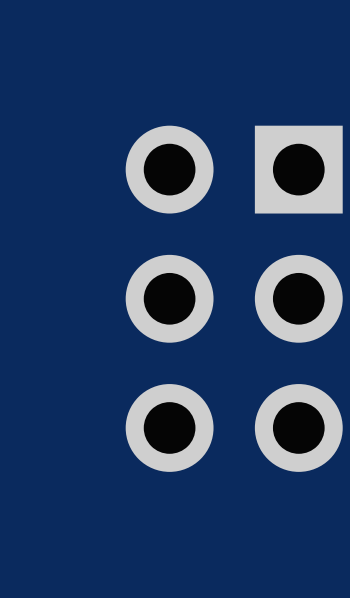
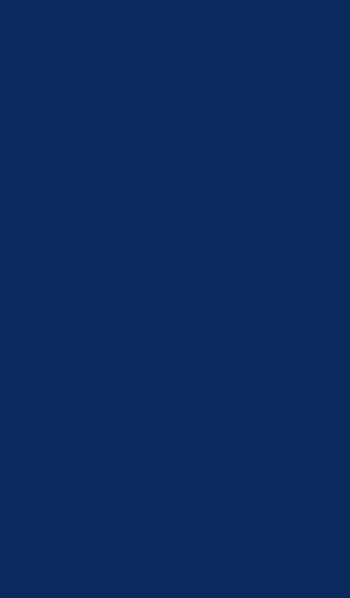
part: (234, 298) -> none

